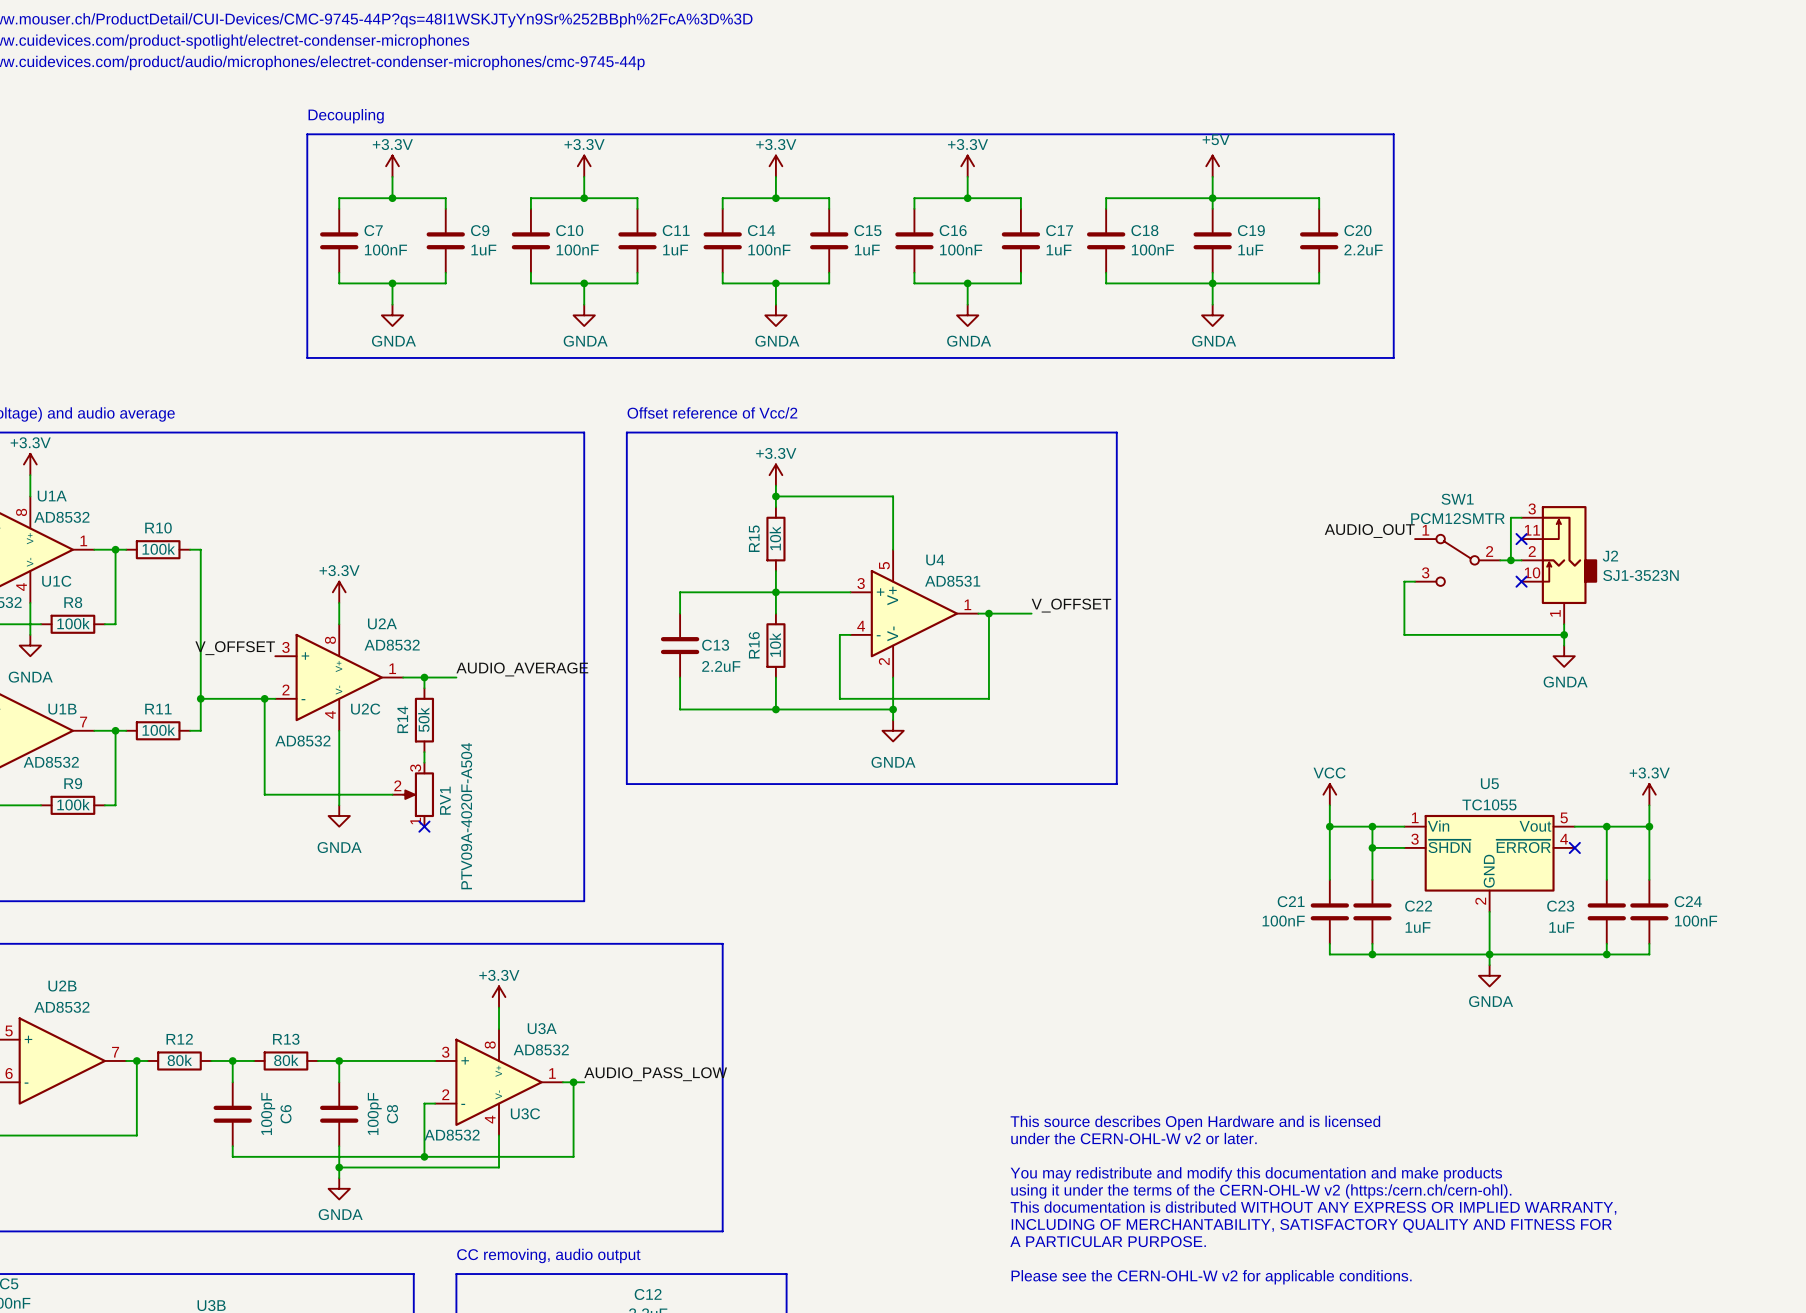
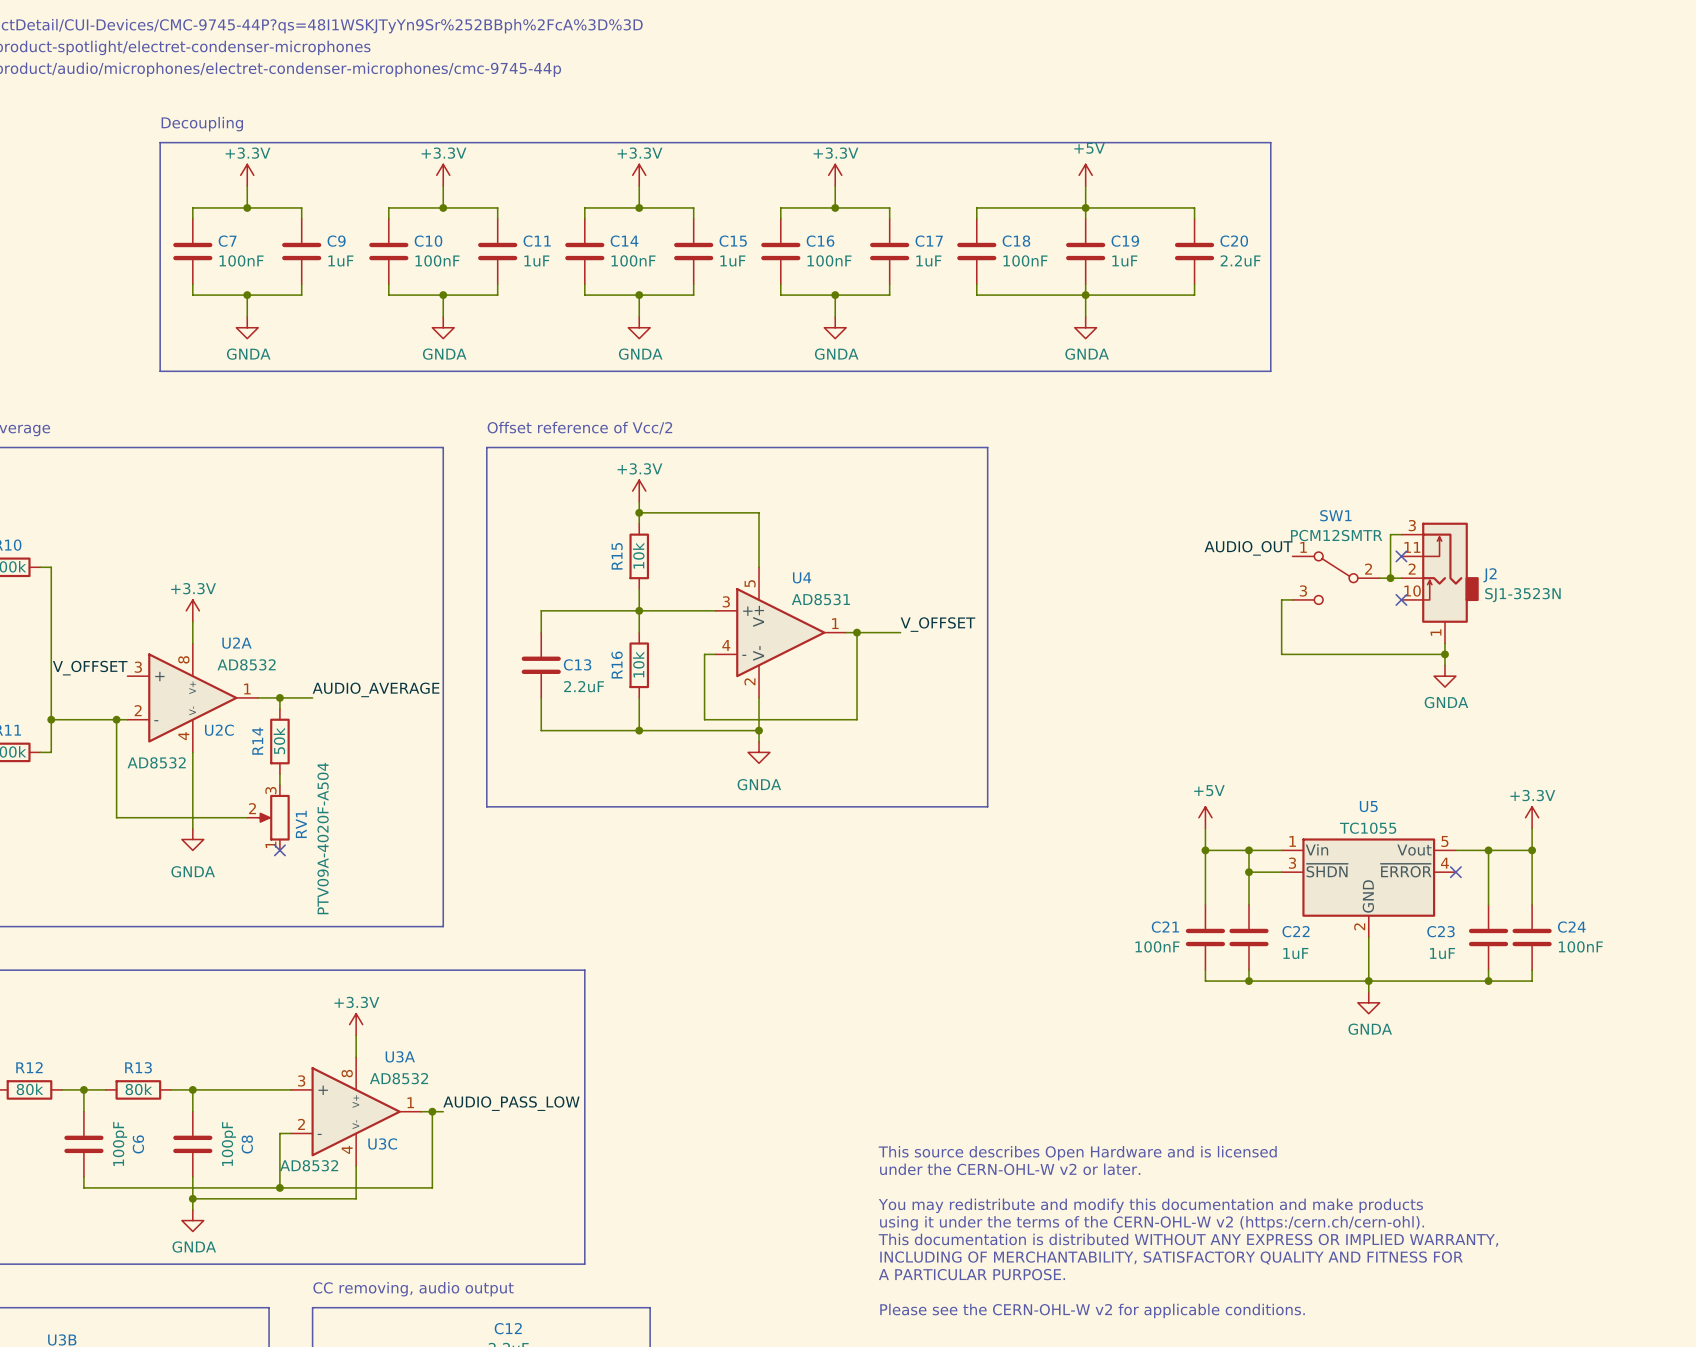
power symbol: VCC (1329, 794) -> +5V (1205, 817)

